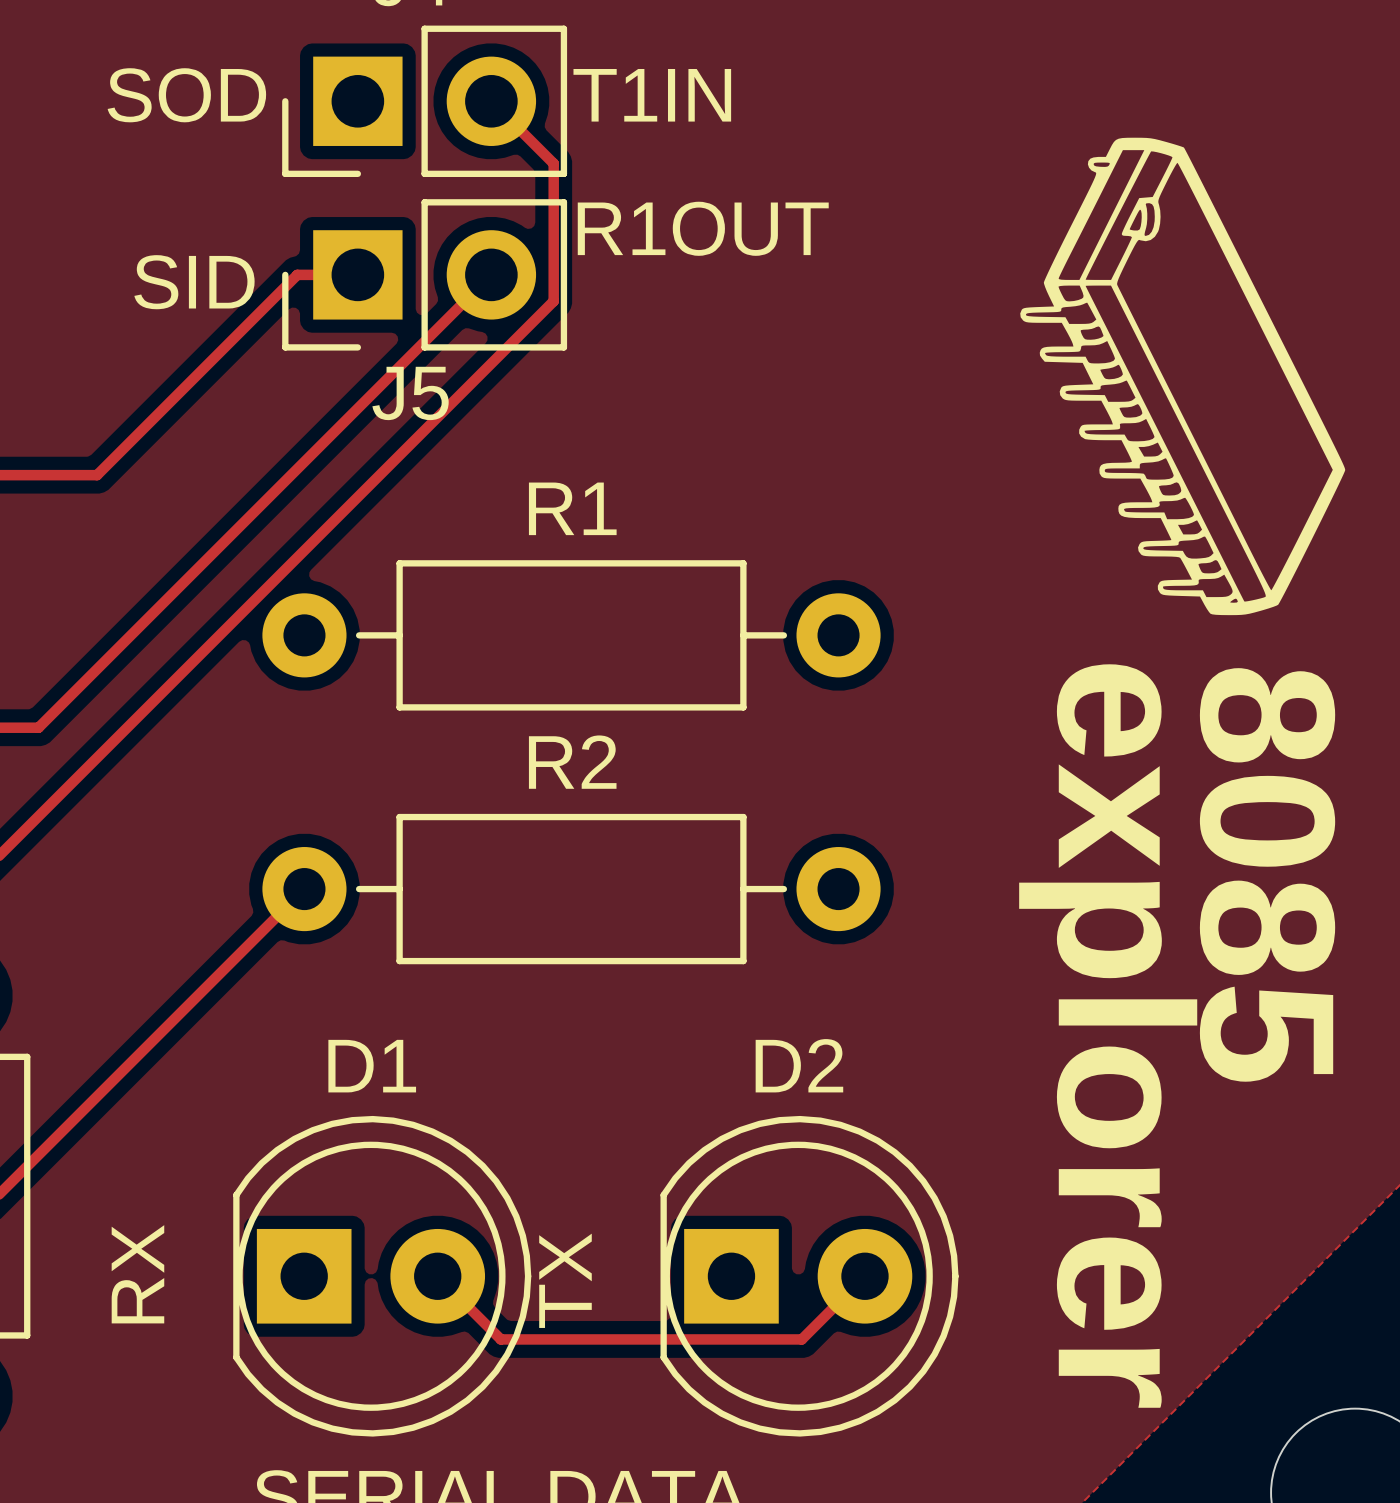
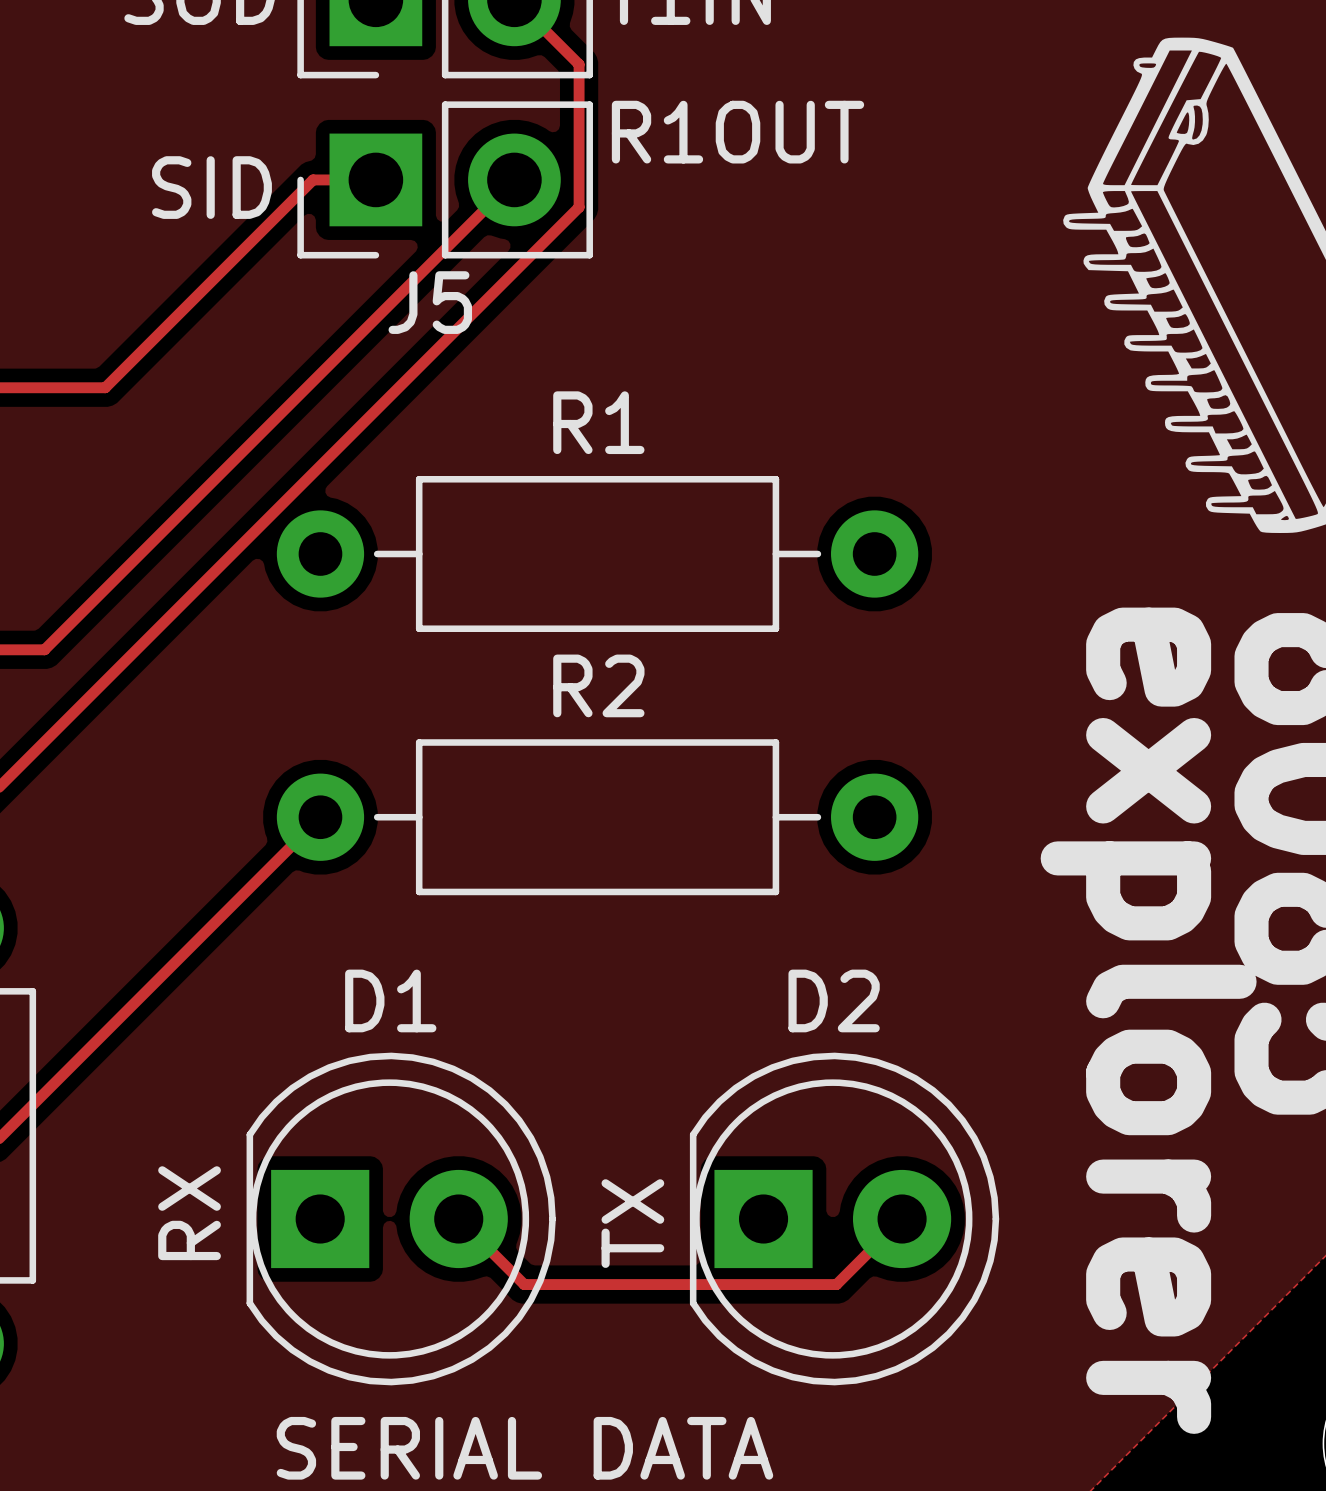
text position: RX (137, 1274) -> RX (189, 1213)
text position: TX (565, 1280) -> TX (632, 1223)

